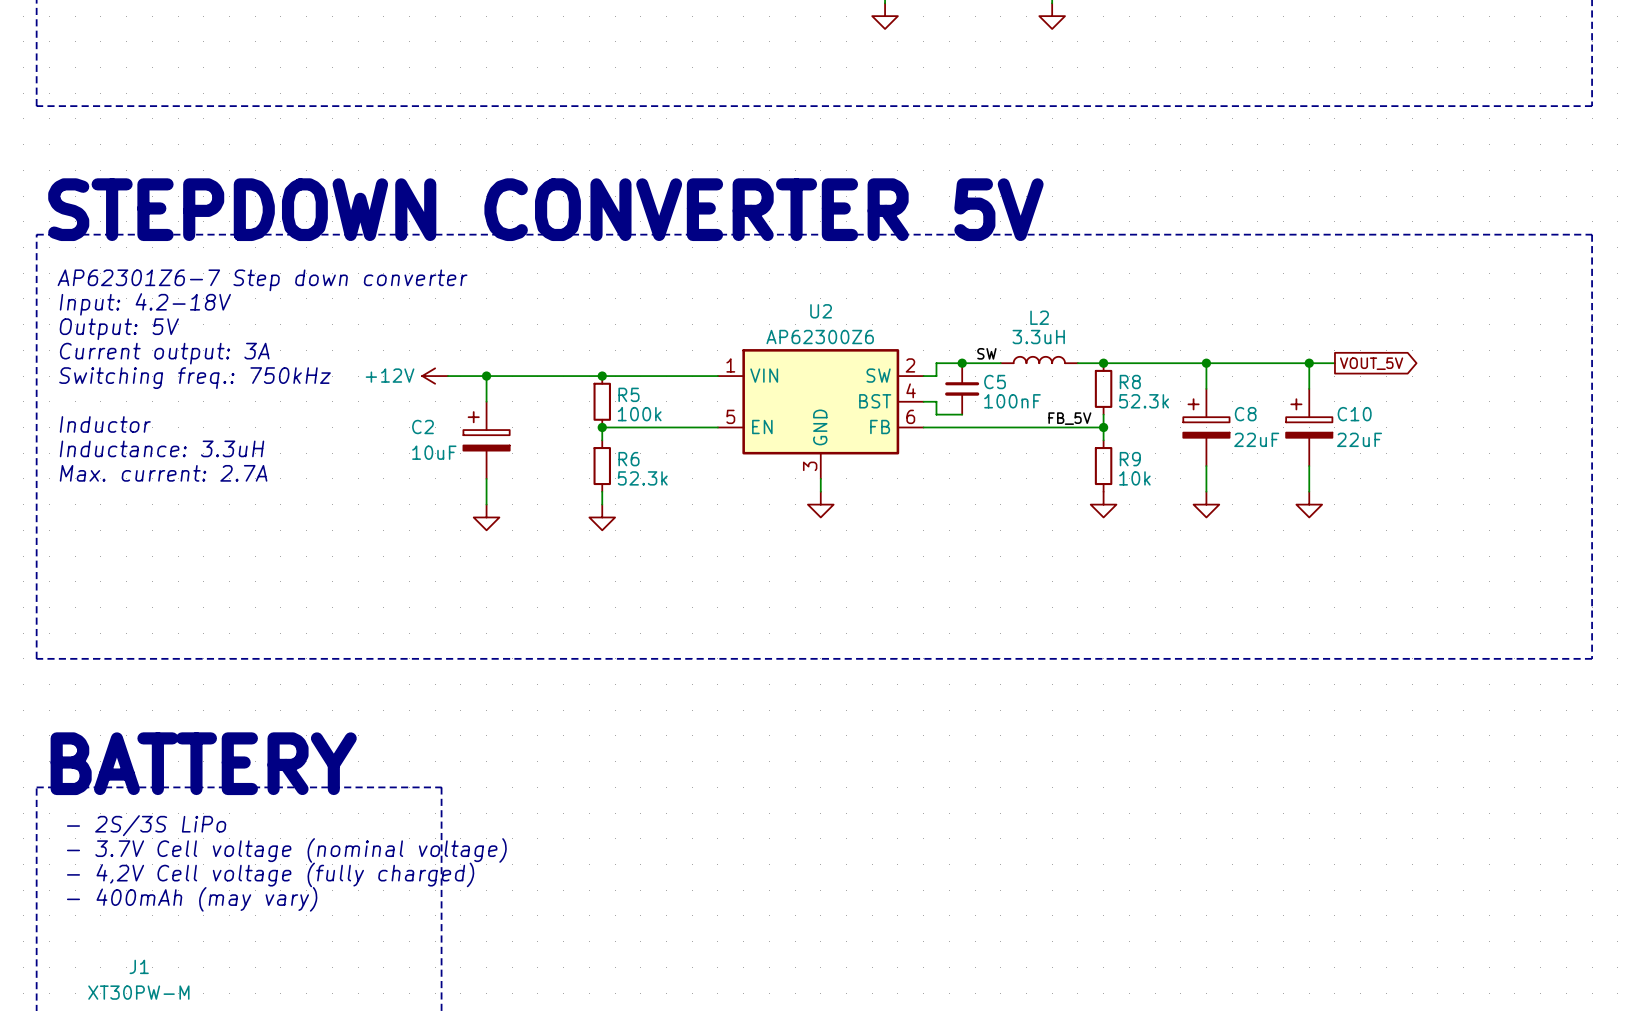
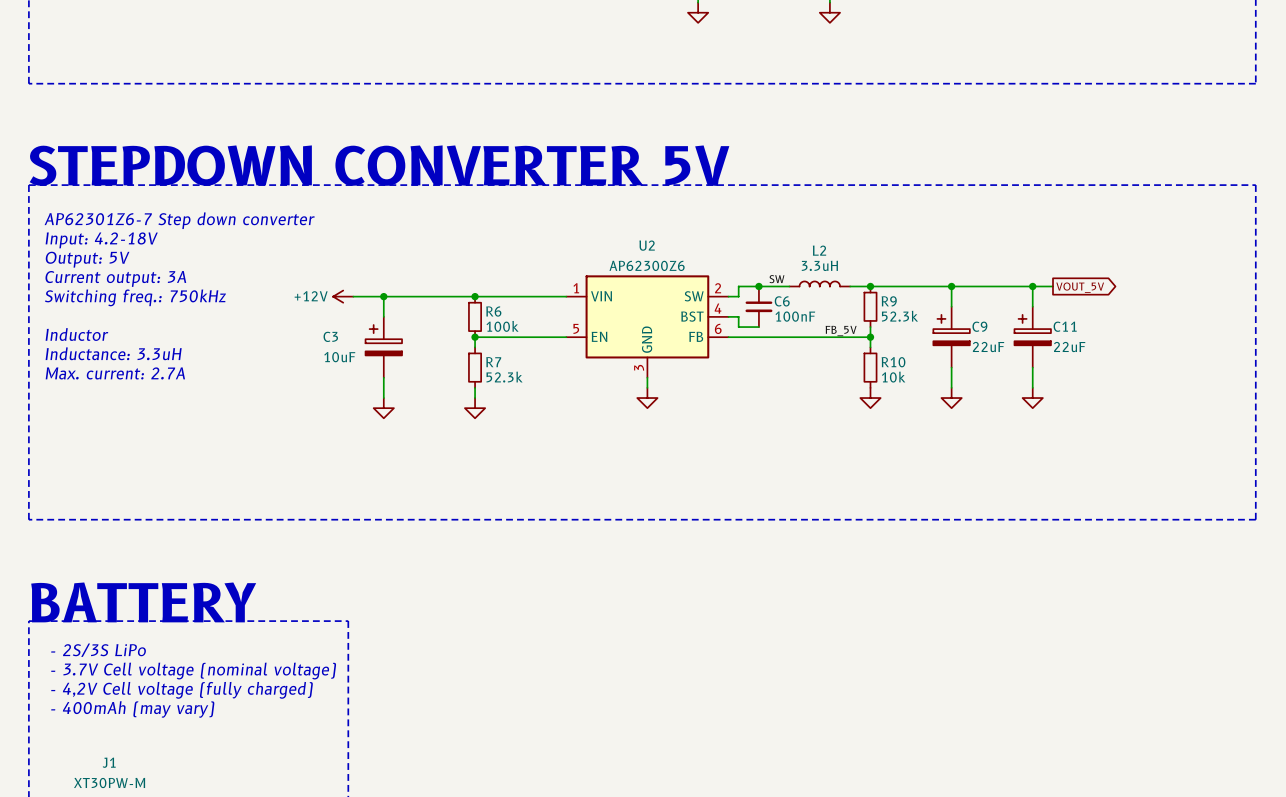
C5 name: C5 (995, 382) -> C6 (782, 301)
R8 name: R8 (1130, 382) -> R9 (889, 301)
R5 name: R5 (628, 394) -> R6 (493, 311)
C8 name: C8 (1245, 414) -> C9 (979, 326)
C10 name: C10 (1354, 414) -> C11 (1065, 326)
C2 name: C2 (422, 426) -> C3 (330, 336)
R6 name: R6 (628, 459) -> R7 (493, 362)
R9 name: R9 (1130, 459) -> R10 (893, 362)

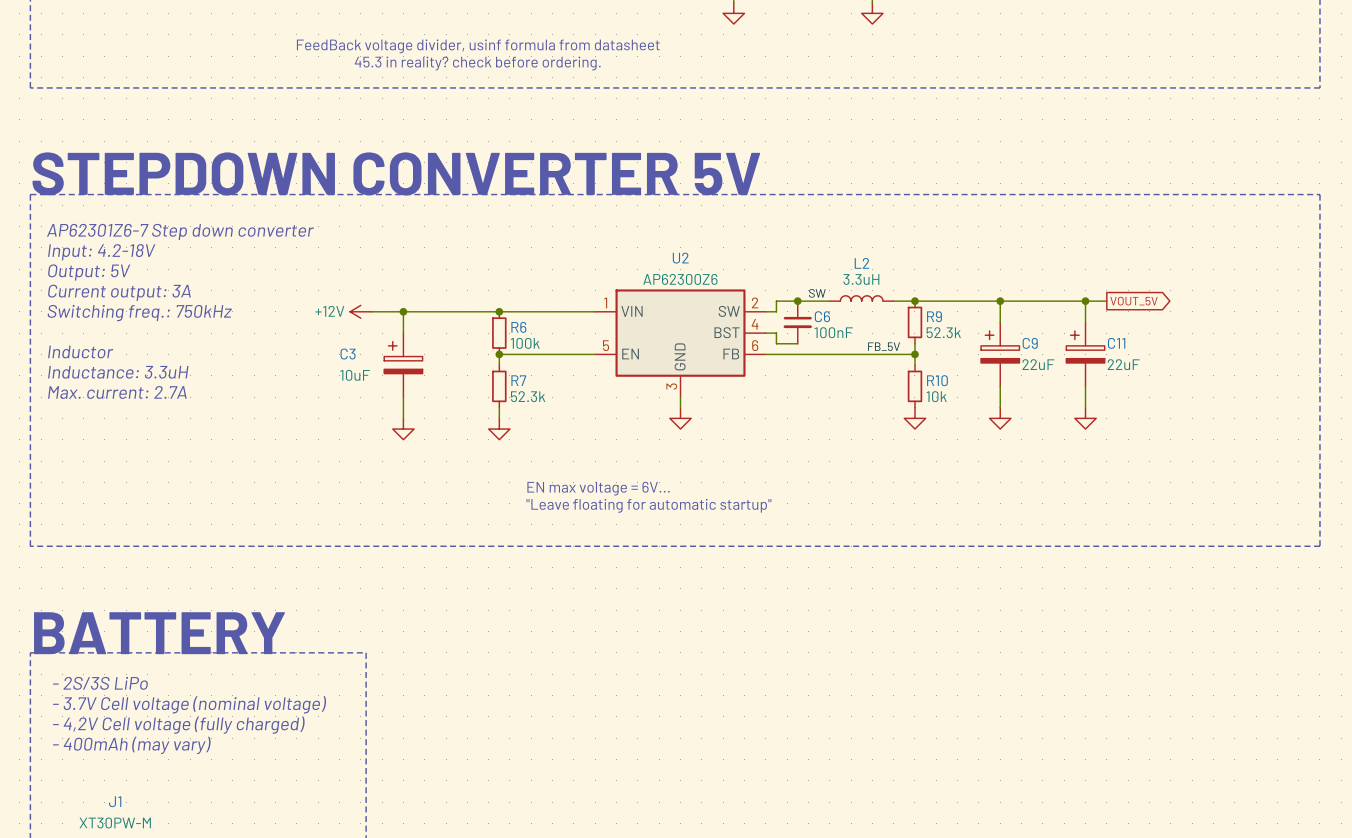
text: none -> FeedBack voltage divider, usinf formula from datasheet (478, 46)
text: none -> 45.3 in reality? check before ordering. (477, 63)
text: none -> EN max voltage = 6V... (598, 488)
text: none -> "Leave floating for automatic startup" (648, 505)

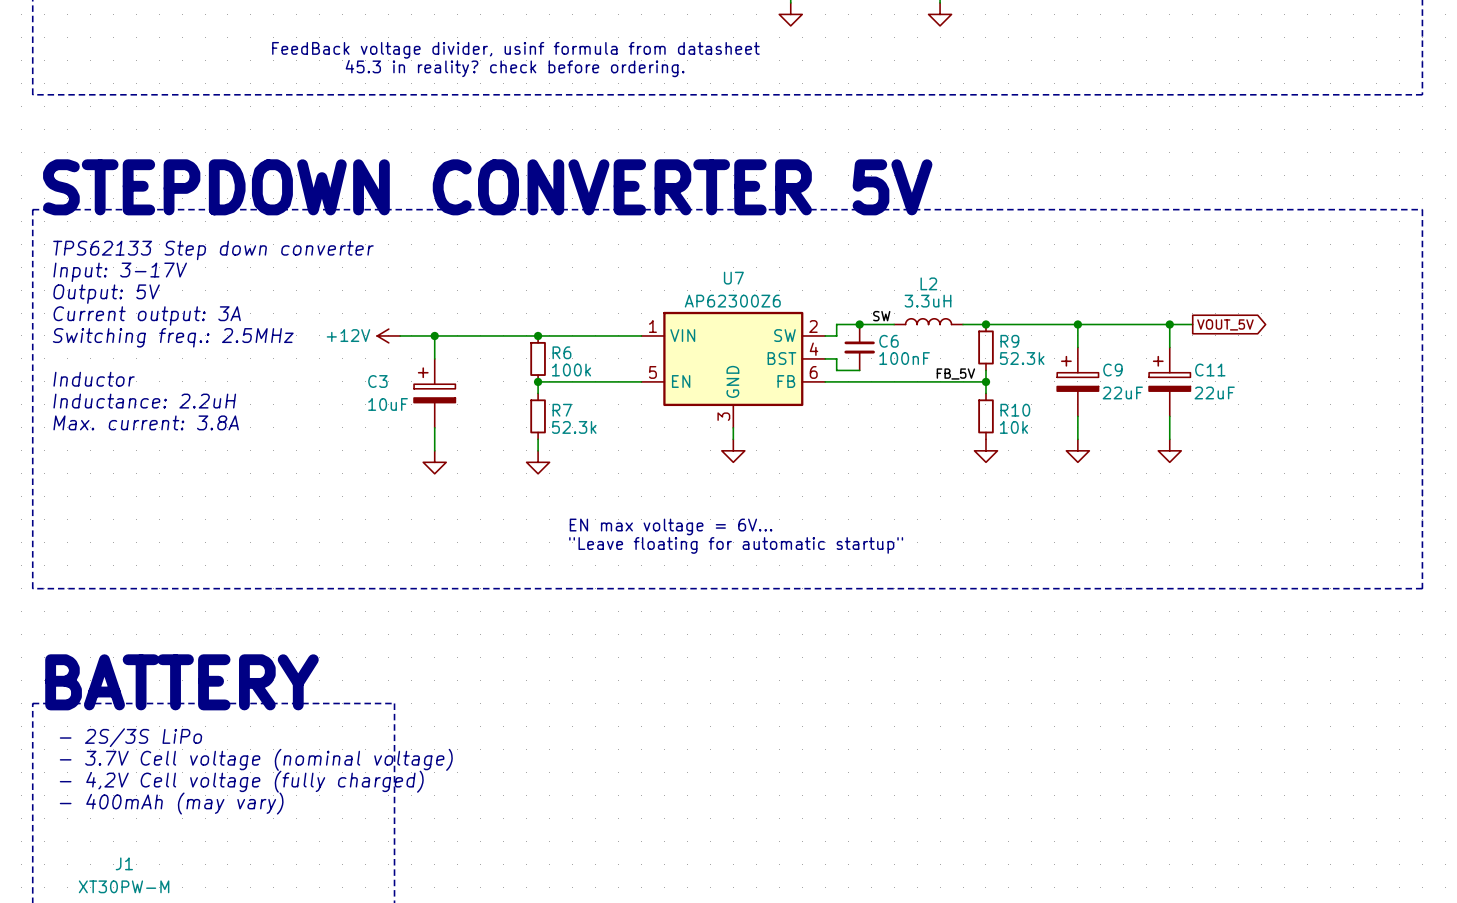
text: AP62301Z6-7 Step down converter (180, 231) -> TPS62133 Step down converter (213, 250)
text: Input: 4.2-18V (101, 252) -> Input: 3-17V (120, 272)
U2 name: U2 (680, 258) -> U7 (733, 278)
text: Switching freq.: 750kHz (139, 313) -> Switching freq.: 2.5MHz (173, 337)
text: Inductance: 3.3uH (118, 372) -> Inductance: 2.2uH (144, 401)
text: Max. current: 2.7A (117, 392) -> Max. current: 3.8A (146, 422)

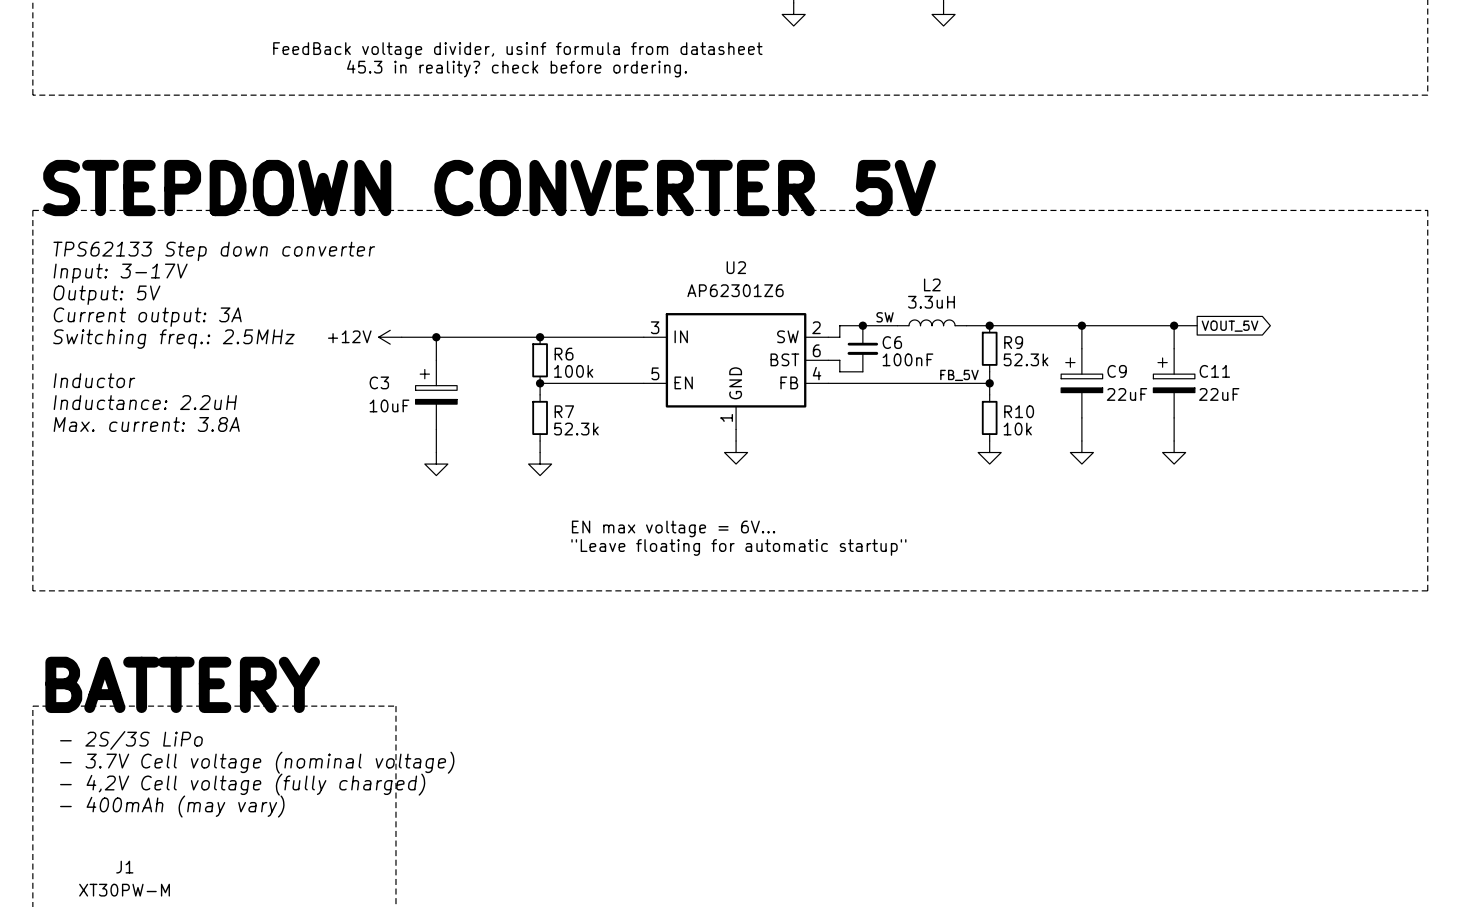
U7 name: U7 (733, 278) -> U2 (736, 267)
U7 value: AP62300Z6 (732, 301) -> AP62301Z6 (735, 290)
U7 pin number: 1 (652, 326) -> 3 (655, 327)
U7 pin name: VIN (682, 335) -> IN (681, 336)
U7 pin number: 4 (813, 349) -> 6 (816, 350)
U7 pin number: 6 (813, 372) -> 4 (817, 373)
U7 pin number: 3 (723, 416) -> 1 (726, 417)

